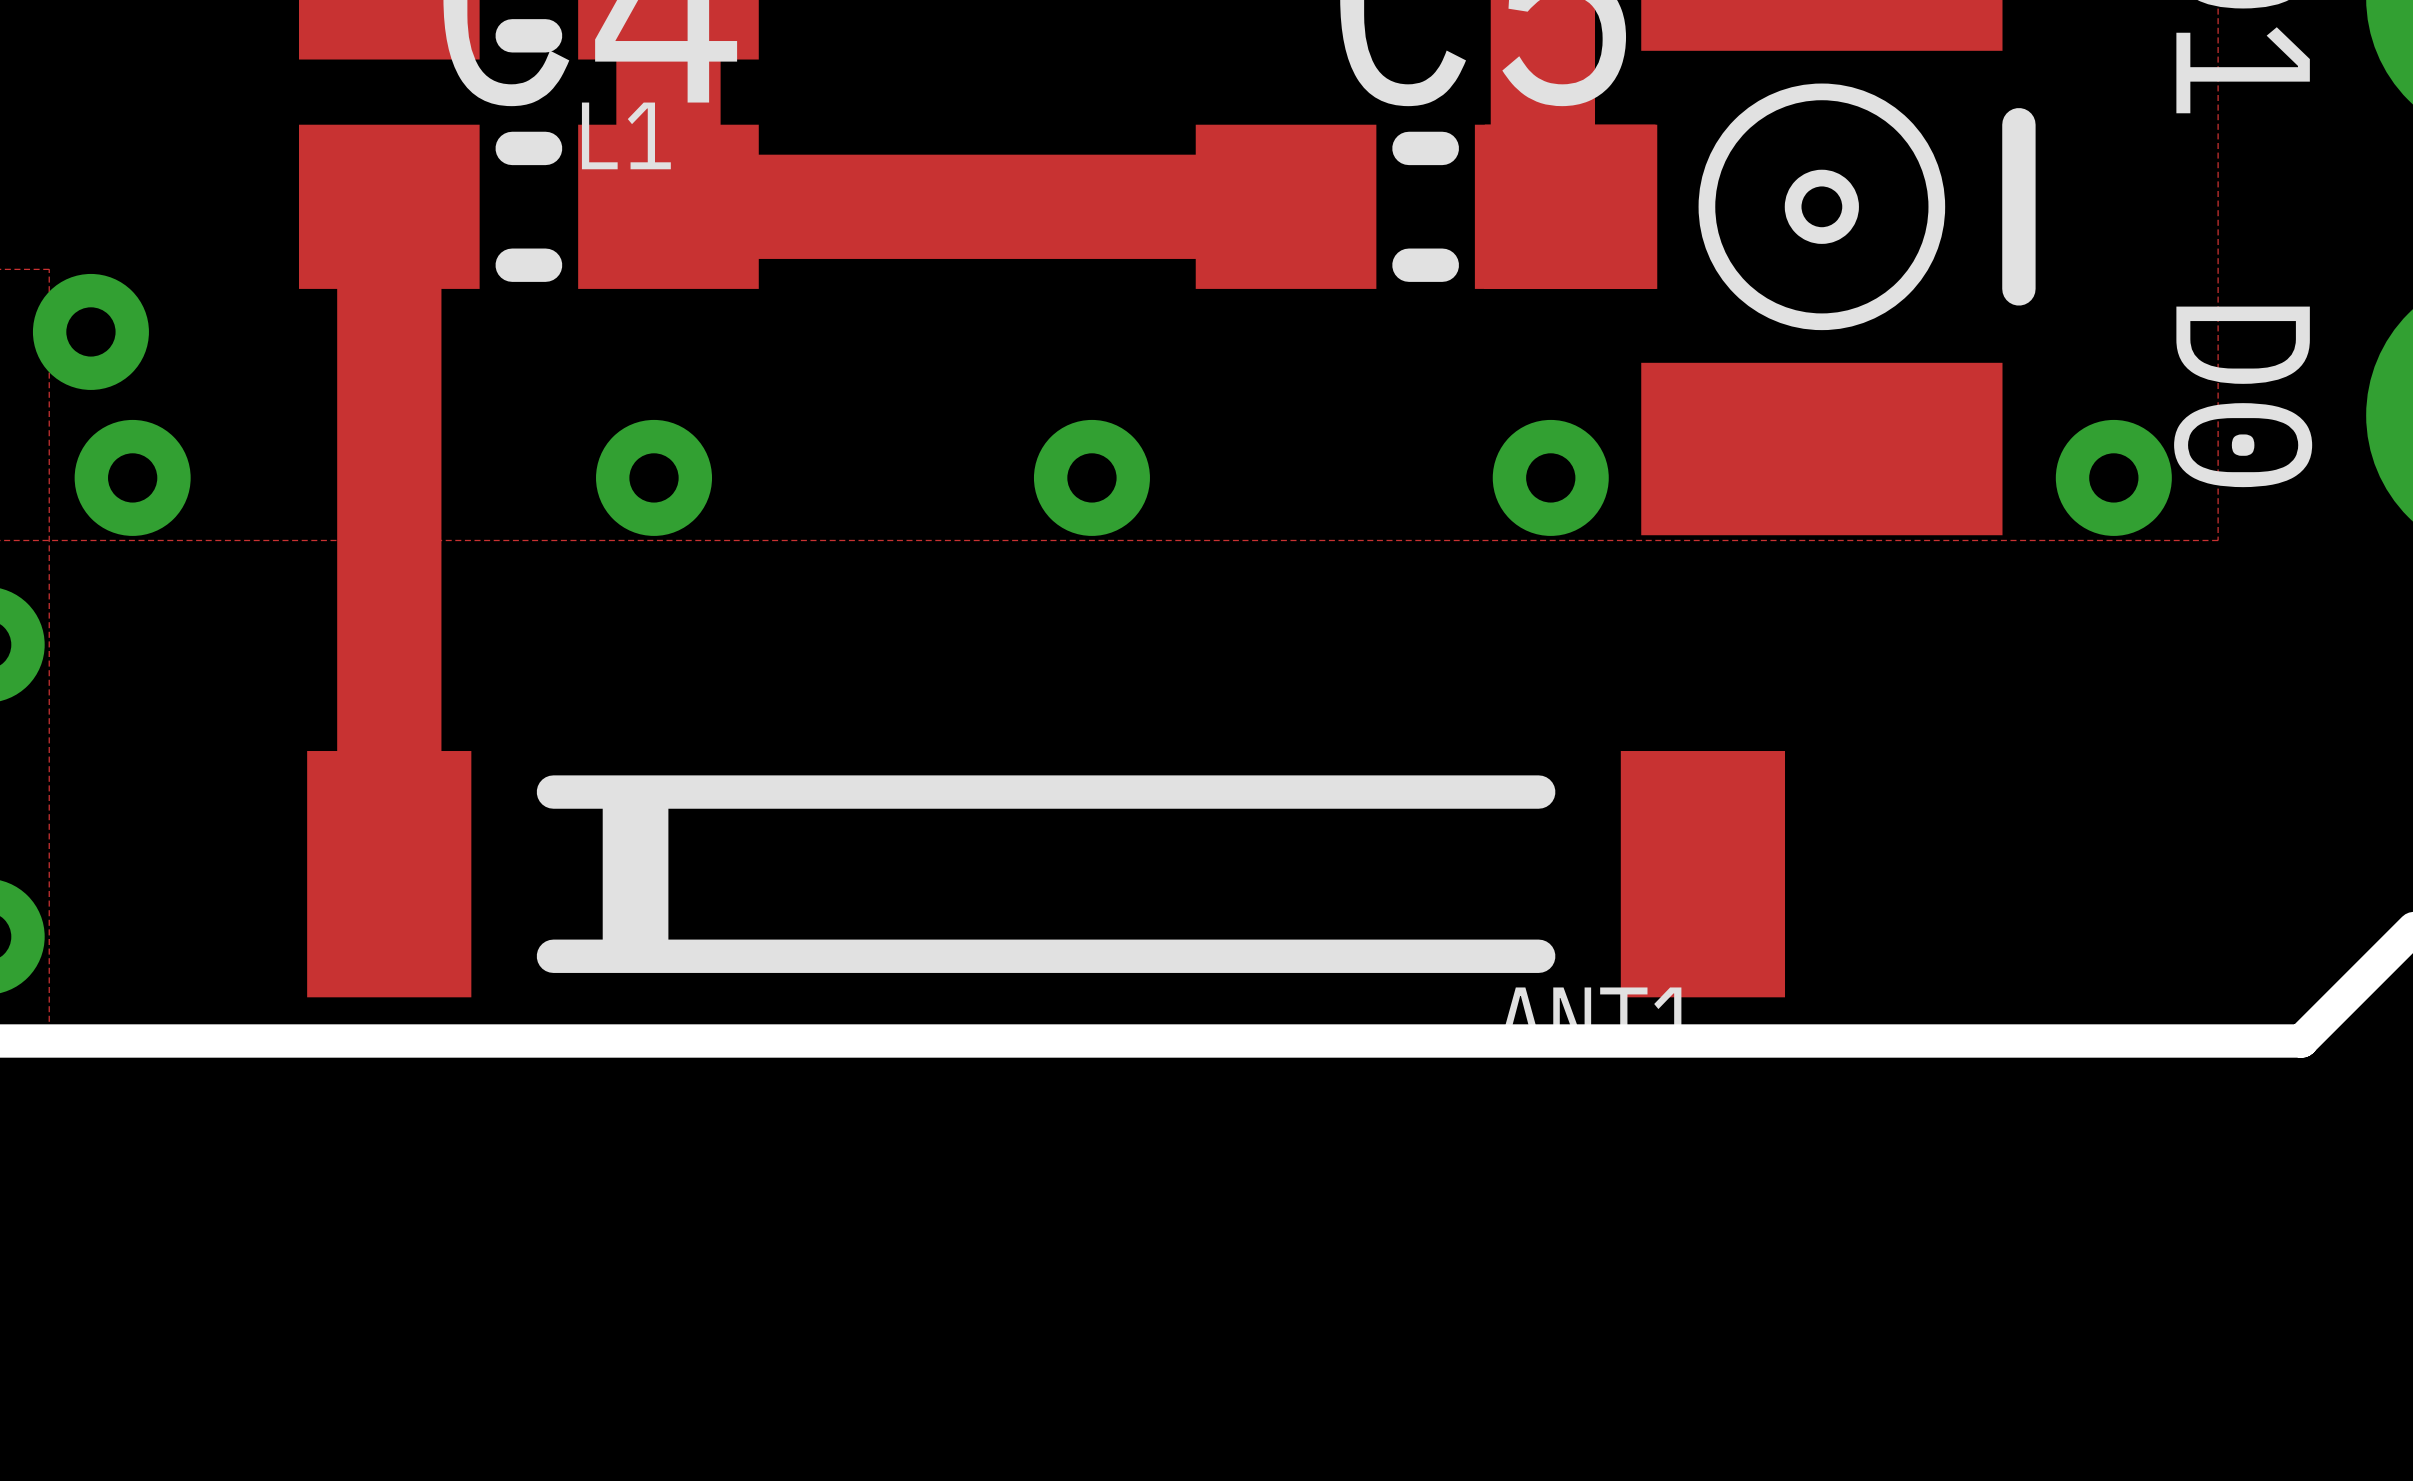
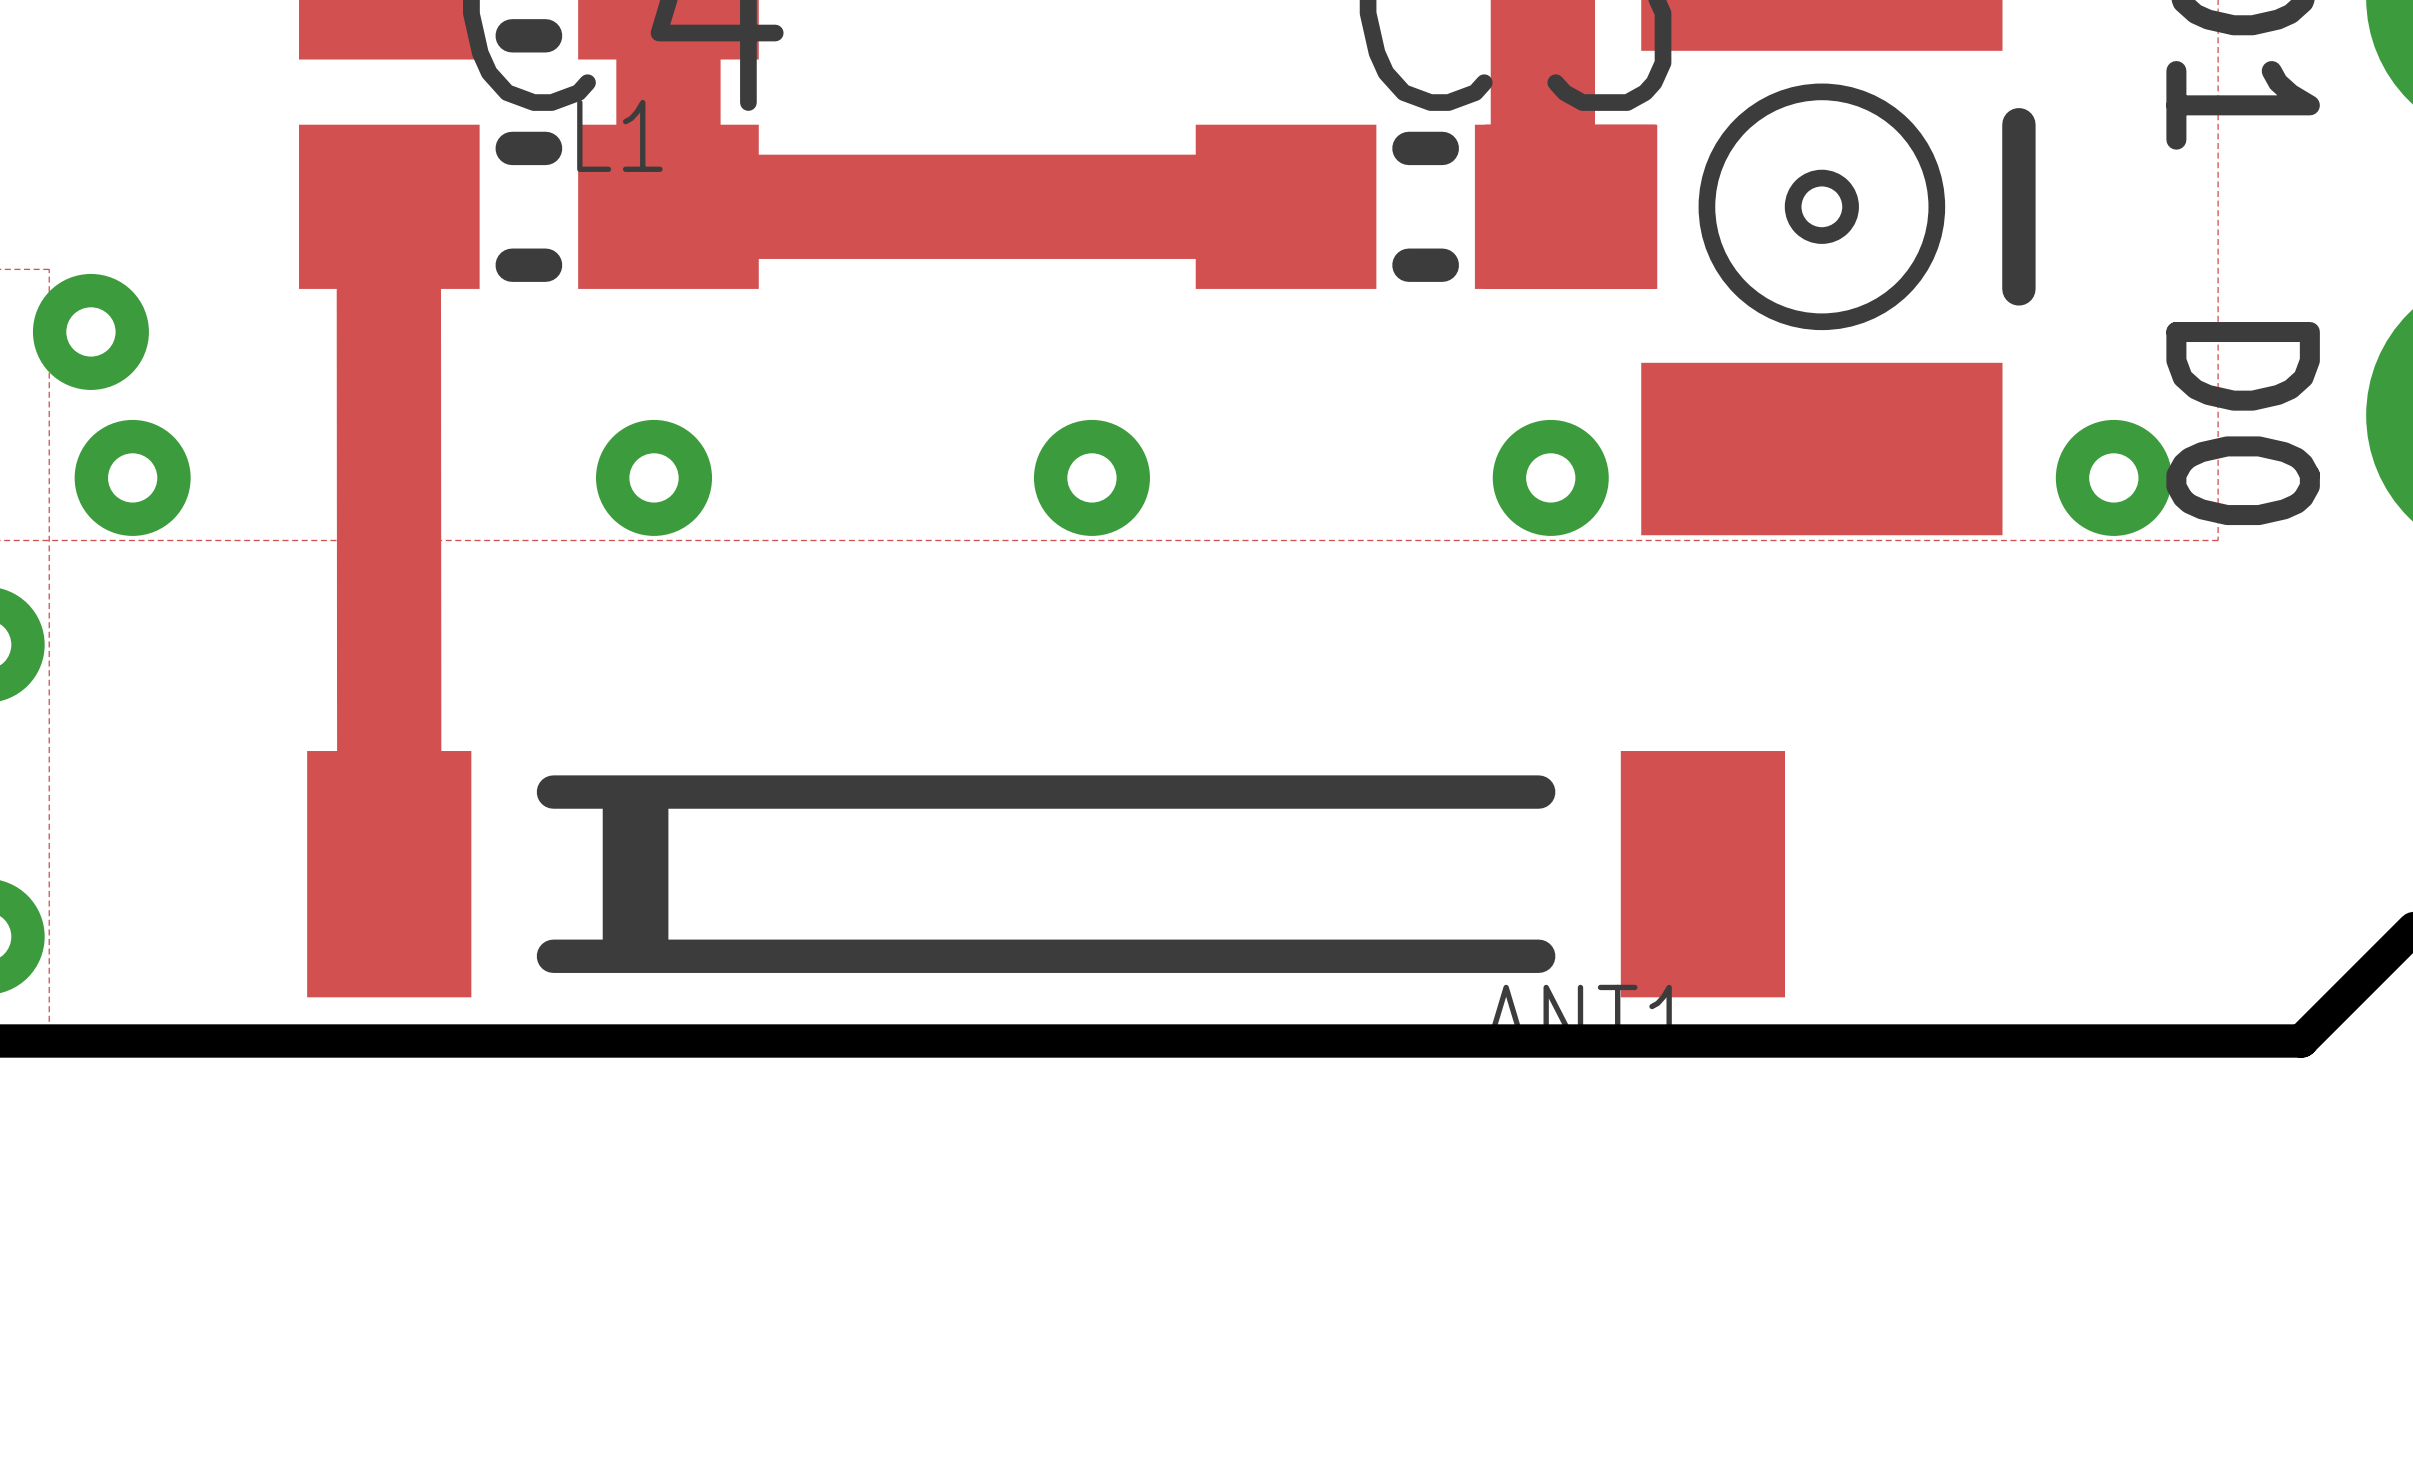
track: (389, 206) (389, 874) -> (388, 206) (389, 874) (393, 886)

